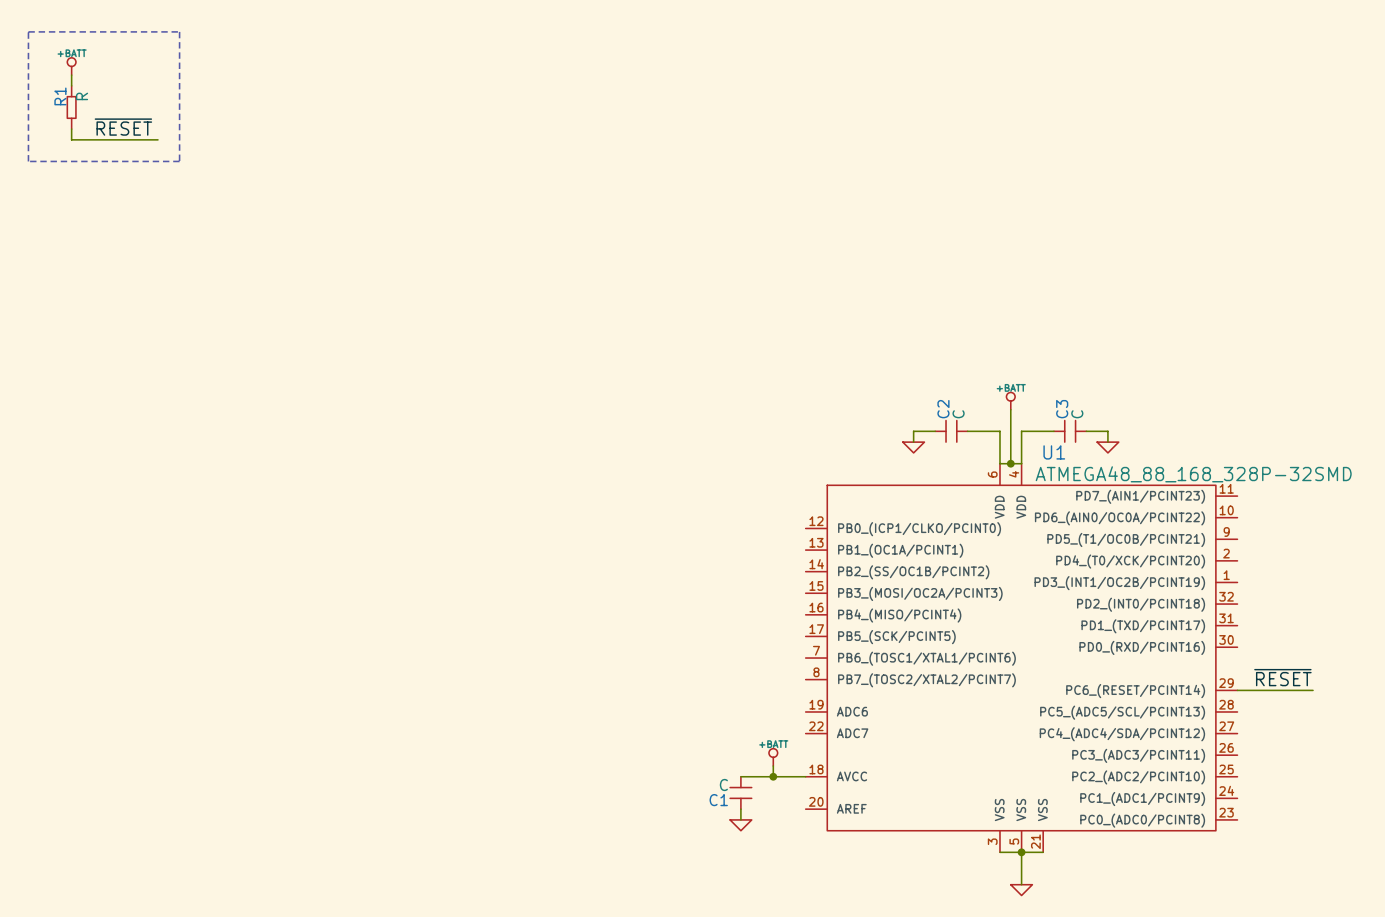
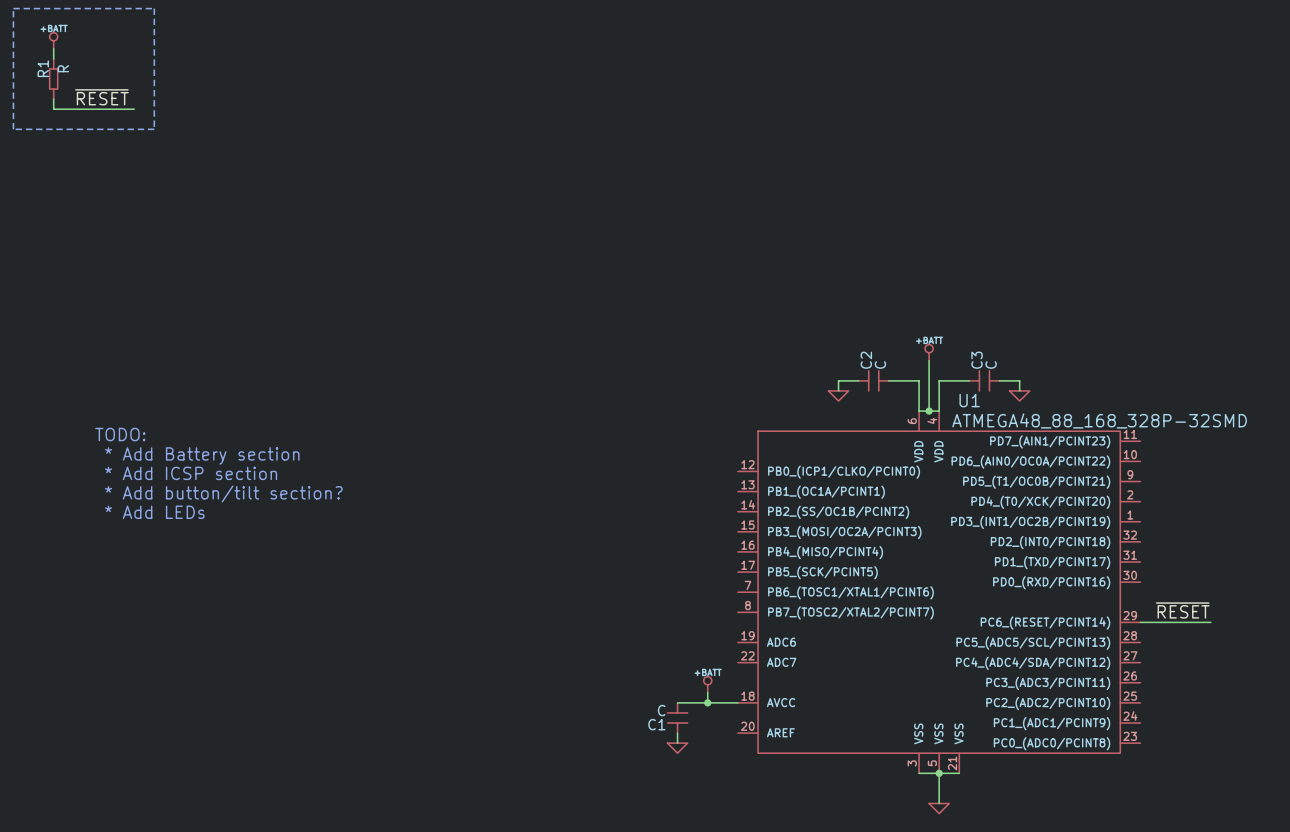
text: none -> TODO: (120, 434)
text: none -> * Add Battery section (202, 455)
text: none -> * Add ICSP section (191, 473)
text: none -> * Add button/tilt section? (223, 493)
text: none -> * Add LEDs (154, 512)

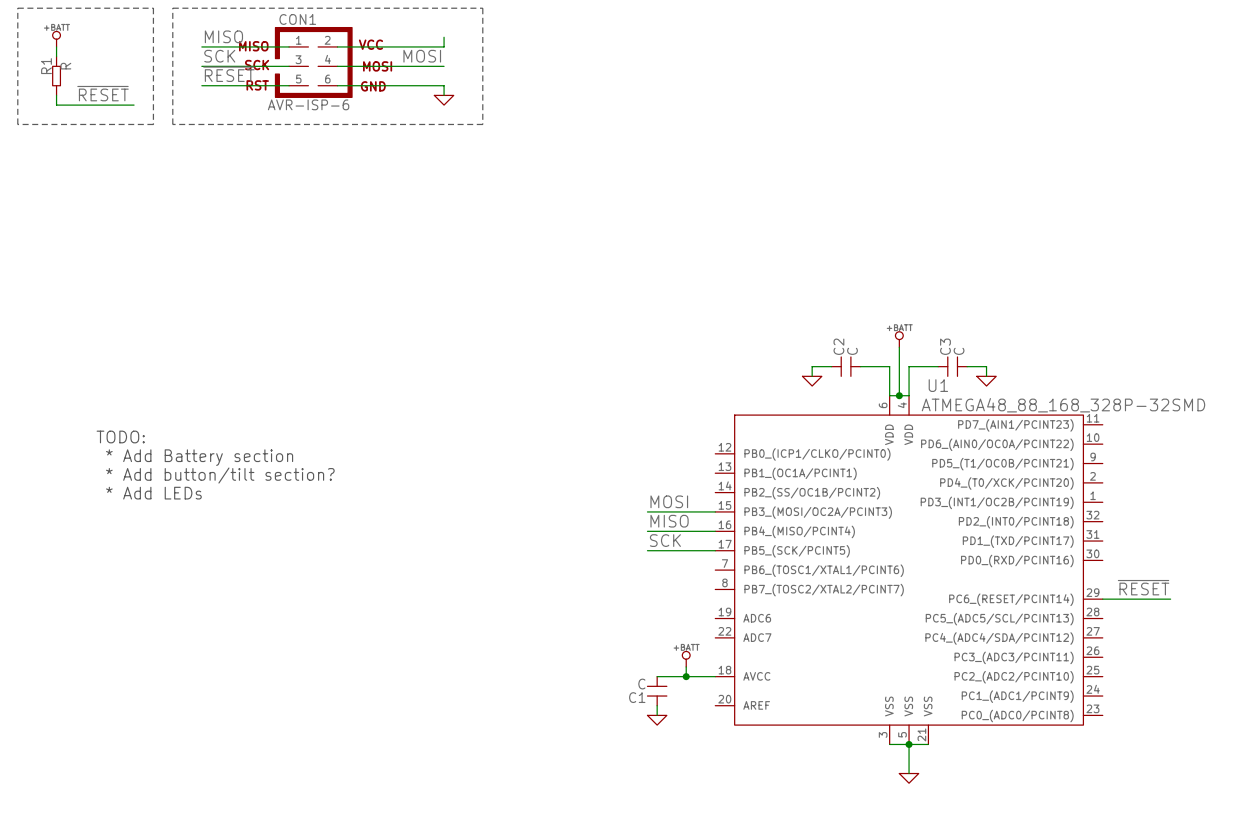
line: none -> (172, 8) (482, 8) (482, 124) (172, 124) (172, 8)
label: none -> MISO (223, 36)
wire: none -> (444, 37) (444, 46) (337, 46)
wire: none -> (201, 46) (289, 46)
label: none -> SCK (219, 56)
label: none -> MOSI (422, 56)
CON1: none -> AVR-ISP-6 (313, 62)
wire: none -> (201, 66) (289, 66)
wire: none -> (337, 66) (444, 66)
label: none -> ~{RESET} (228, 74)
wire: none -> (201, 85) (289, 85)
wire: none -> (337, 85) (444, 85) (444, 95)
power symbol: none -> (444, 100)
text: TODO: (120, 434) -> none
text: * Add Battery section (202, 455) -> TODO: (120, 436)
text: * Add ICSP section (191, 473) -> * Add Battery section (199, 457)
label: none -> MOSI (669, 501)
wire: none -> (647, 511) (715, 511)
label: none -> MISO (669, 521)
wire: none -> (647, 531) (715, 531)
label: none -> SCK (665, 540)
wire: none -> (647, 550) (715, 550)

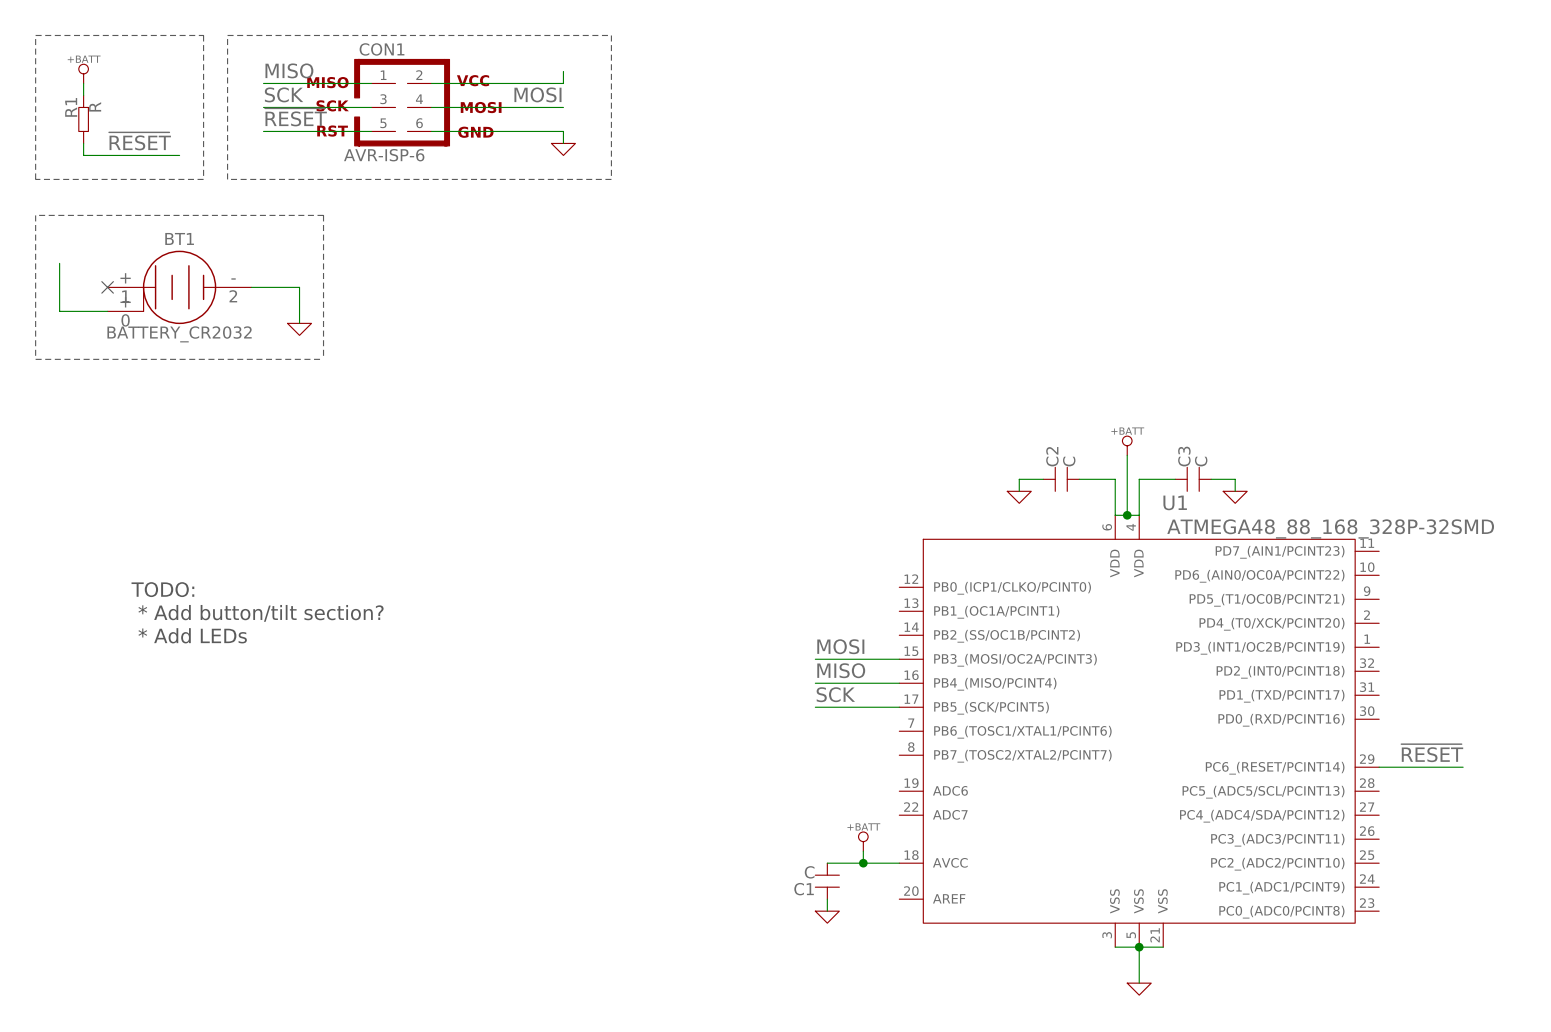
line: none -> (35, 215) (323, 215) (323, 359) (35, 359) (35, 215)
wire: none -> (59, 263) (59, 311) (107, 311)
no-connect mark: none -> (107, 287)
BT1: none -> BATTERY_CR2032 (179, 287)
wire: none -> (251, 287) (299, 287) (299, 323)
power symbol: none -> (299, 329)
text: TODO: (120, 436) -> none
text: * Add Battery section (199, 457) -> TODO: (162, 589)

